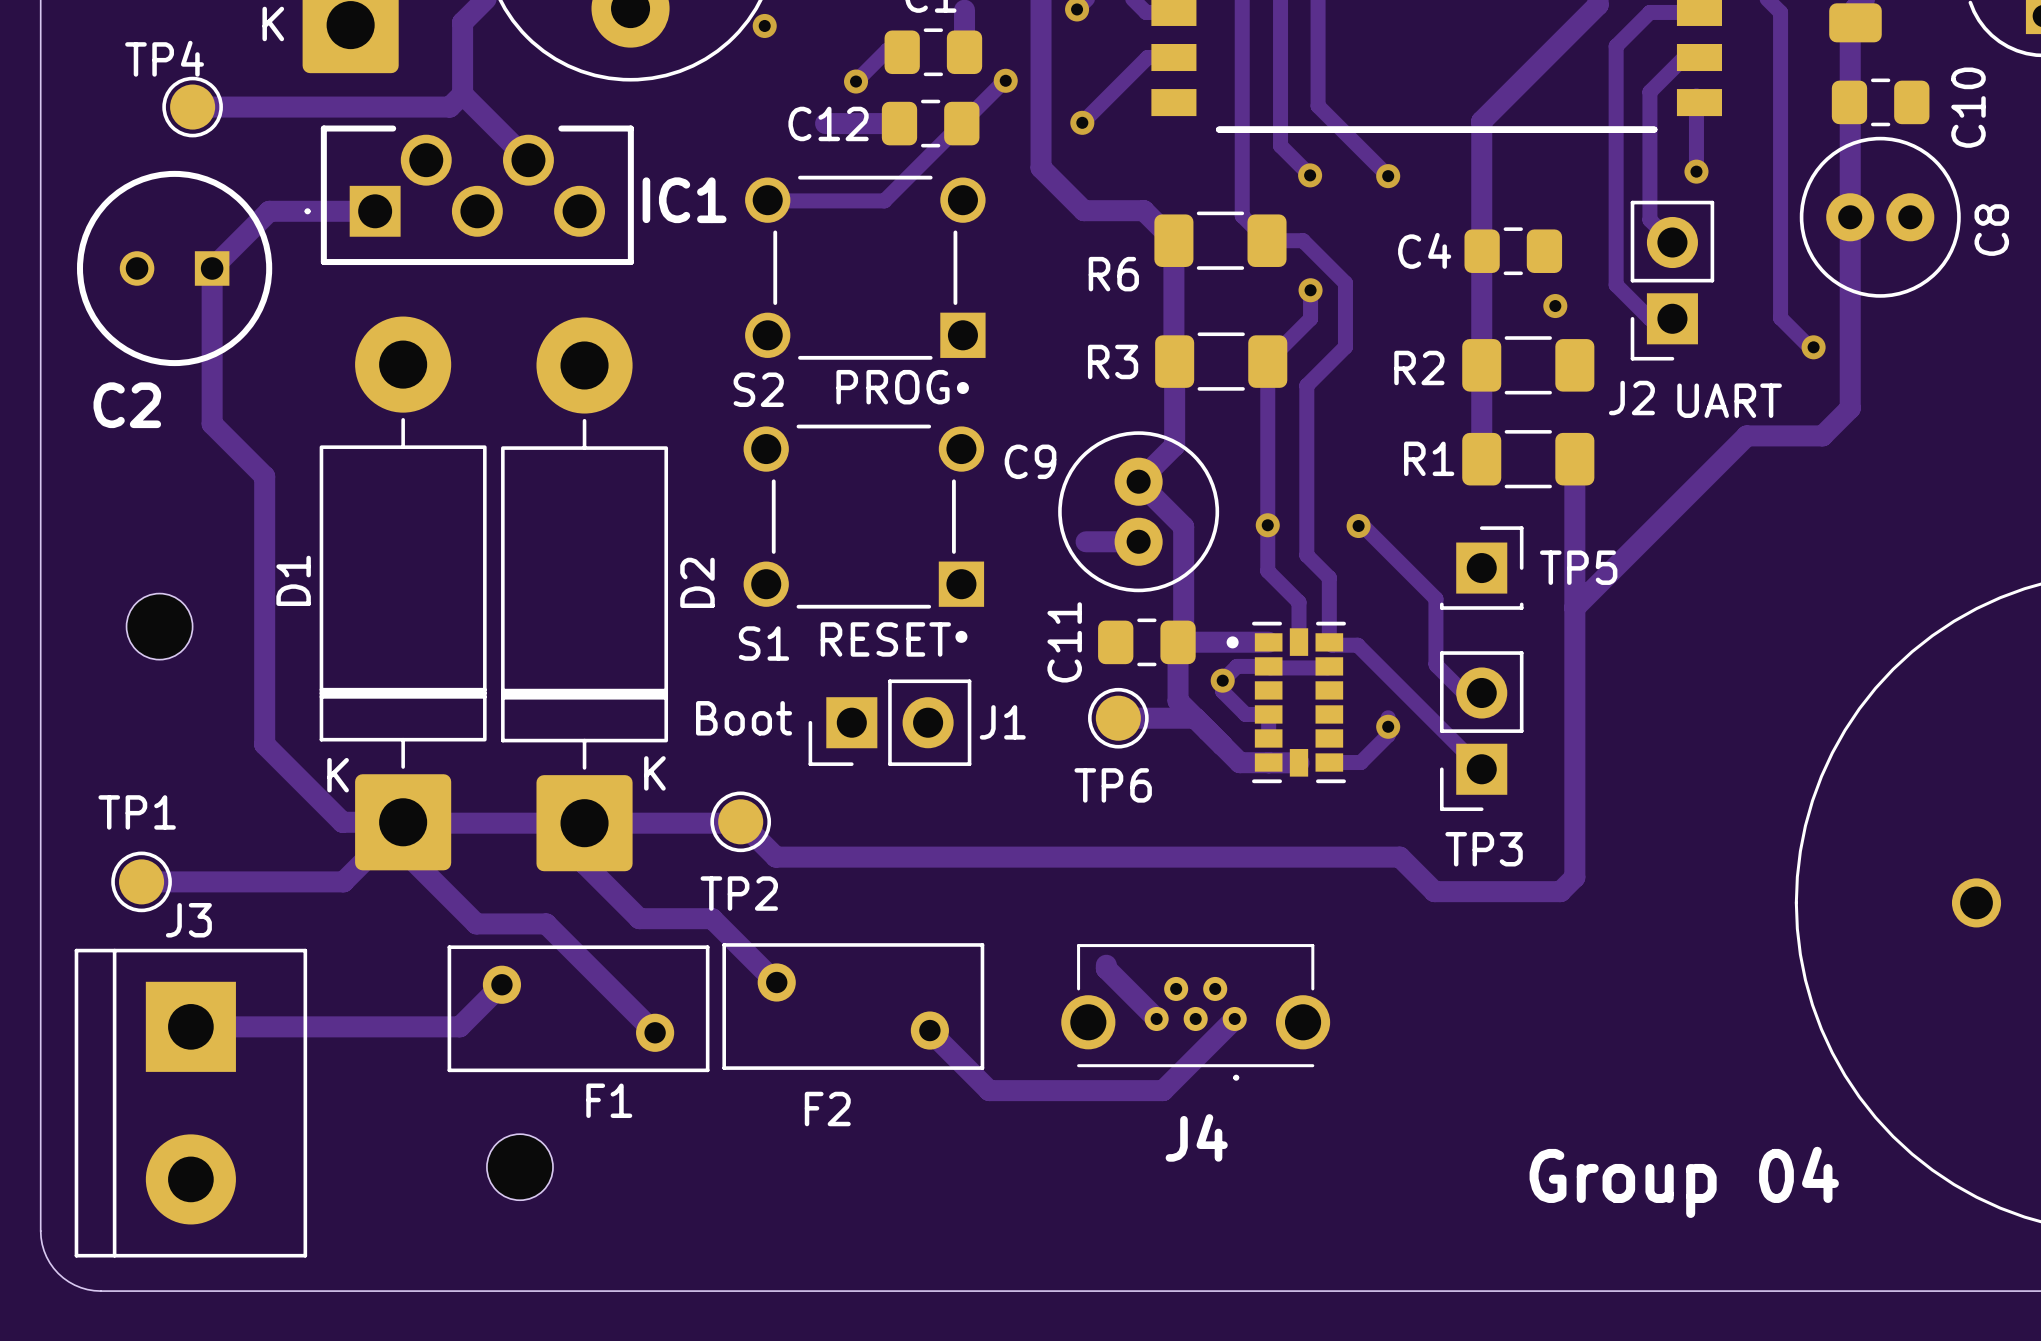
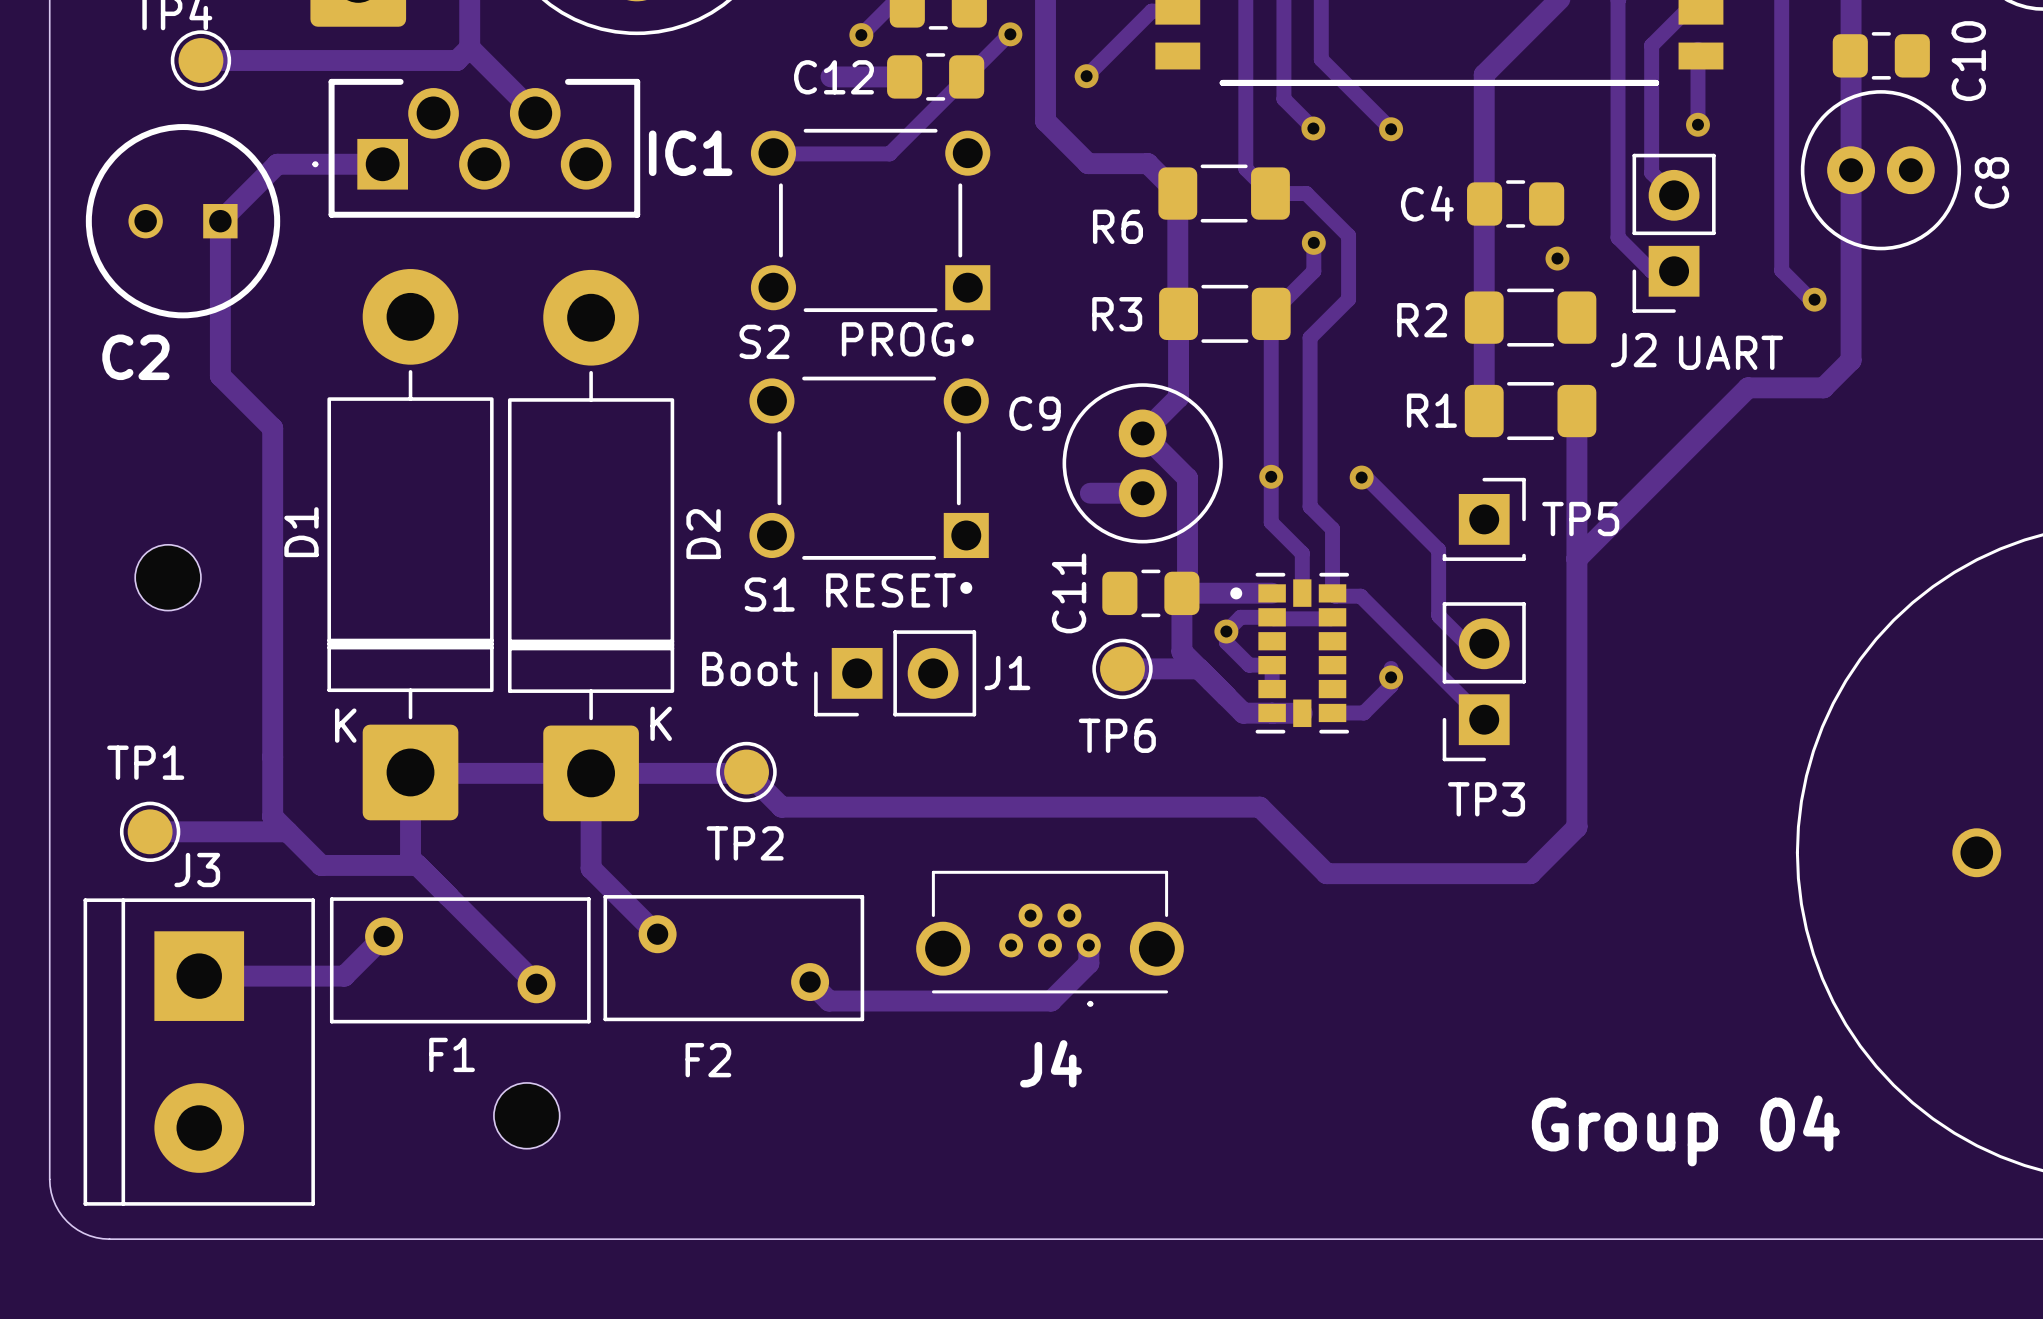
track: (264, 744) (342, 822) (403, 822) (343, 881) (279, 881) -> (272, 695) (272, 816) (321, 865) (417, 865)
track: (403, 850) (476, 923) (546, 923) (655, 1032) -> (410, 800) (410, 858) (536, 984)
track: (1256, 857) (1399, 857) (1434, 891) (1560, 891) -> (1260, 807) (1326, 873) (1530, 873) (1562, 841)
track: (584, 863) (639, 918) (712, 918) (776, 982) -> (591, 813) (591, 868) (657, 934)
track: (1106, 965) (1106, 968) (1156, 1018) -> none
track: (501, 984) (459, 1026) (336, 1026) -> (384, 936) (344, 976)
track: none -> (1088, 945) (1088, 963) (1051, 1001) (829, 1001) (810, 982)
F2 position: (853, 1006) -> (733, 958)
F1 position: (578, 1008) -> (460, 960)
J4 position: (1195, 1012) -> (1049, 938)
track: (1234, 1018) (1163, 1090) (989, 1090) (929, 1030) -> none
F1 name position: F1 (609, 1100) -> F1 (452, 1054)

